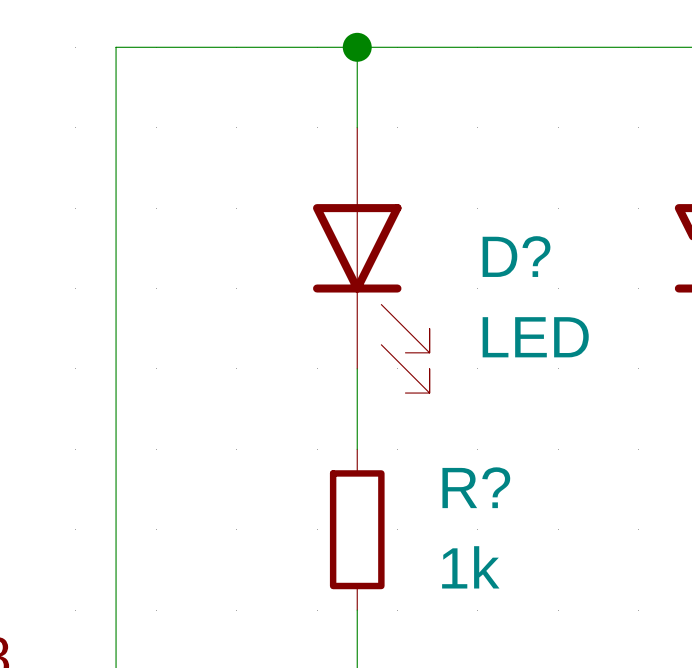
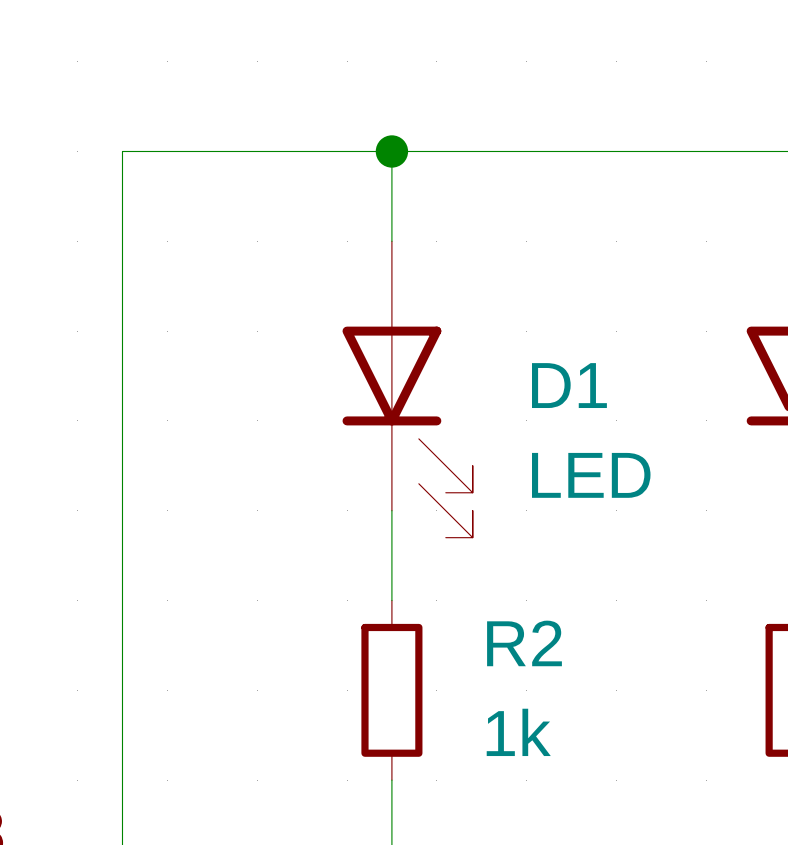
D? name: D? (516, 256) -> D1 (569, 385)
R? name: R? (476, 487) -> R2 (524, 643)

